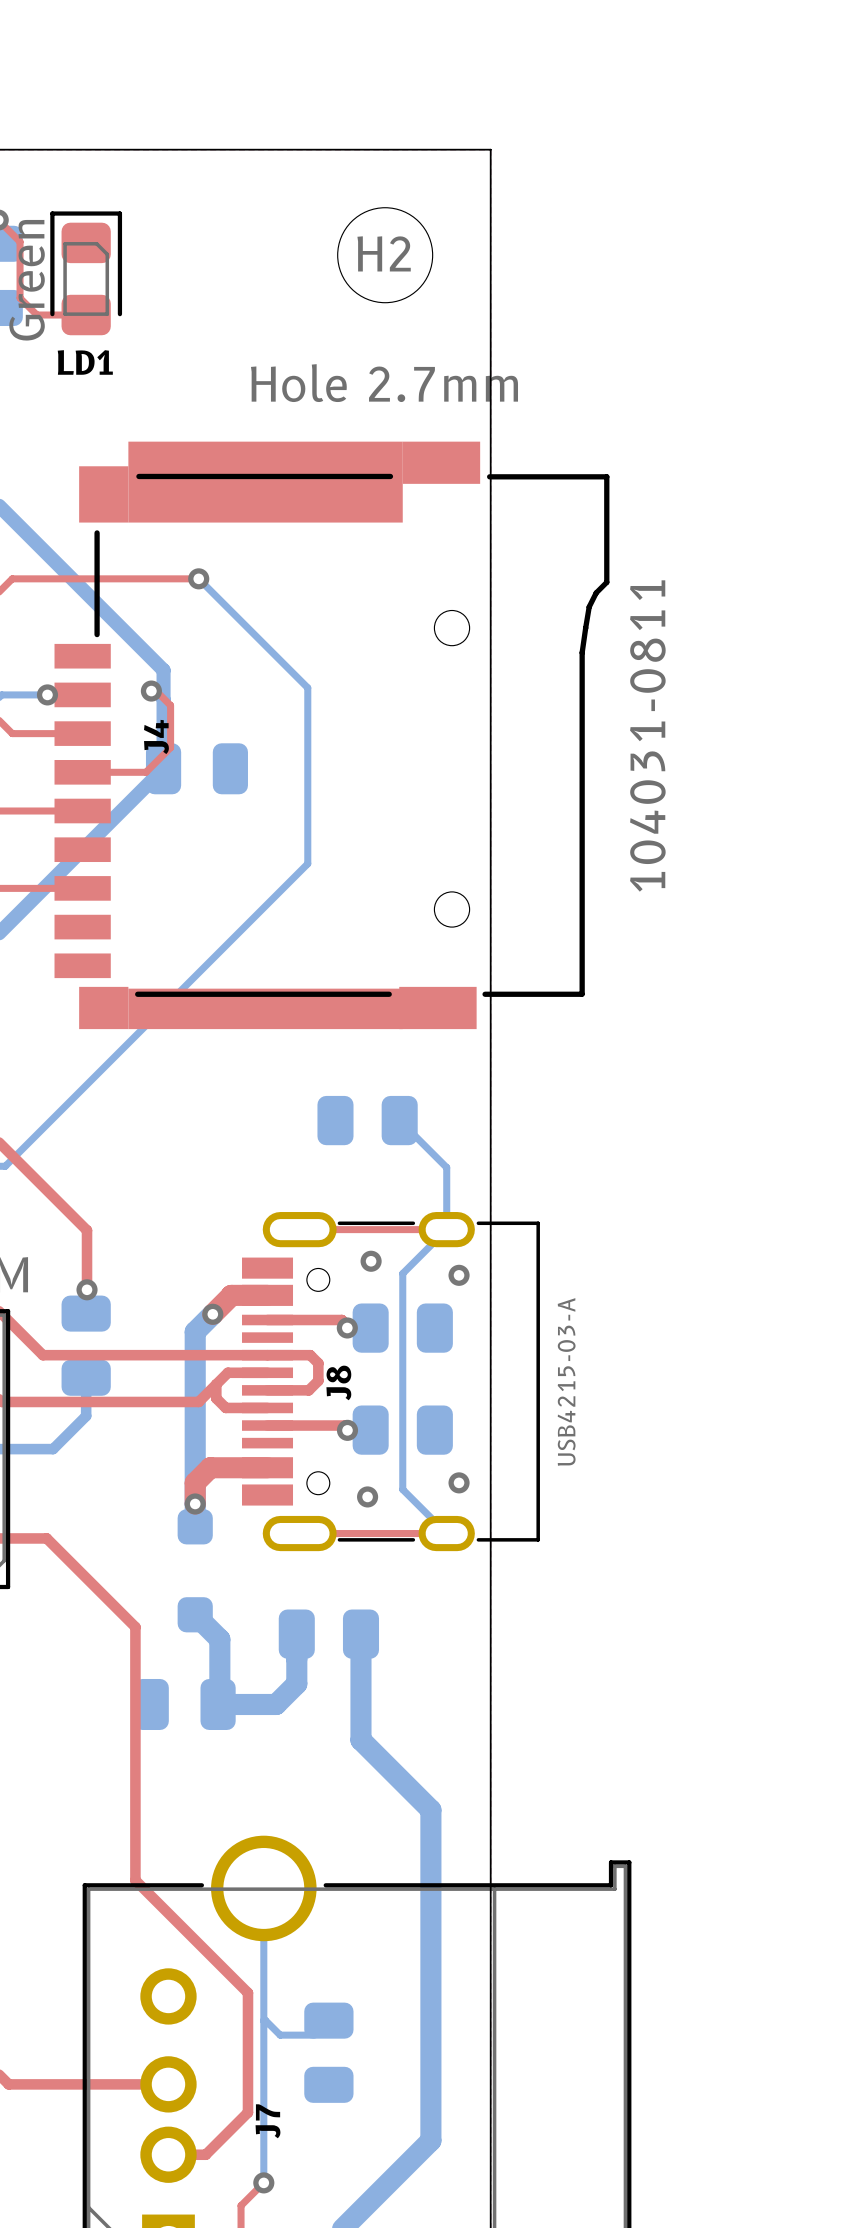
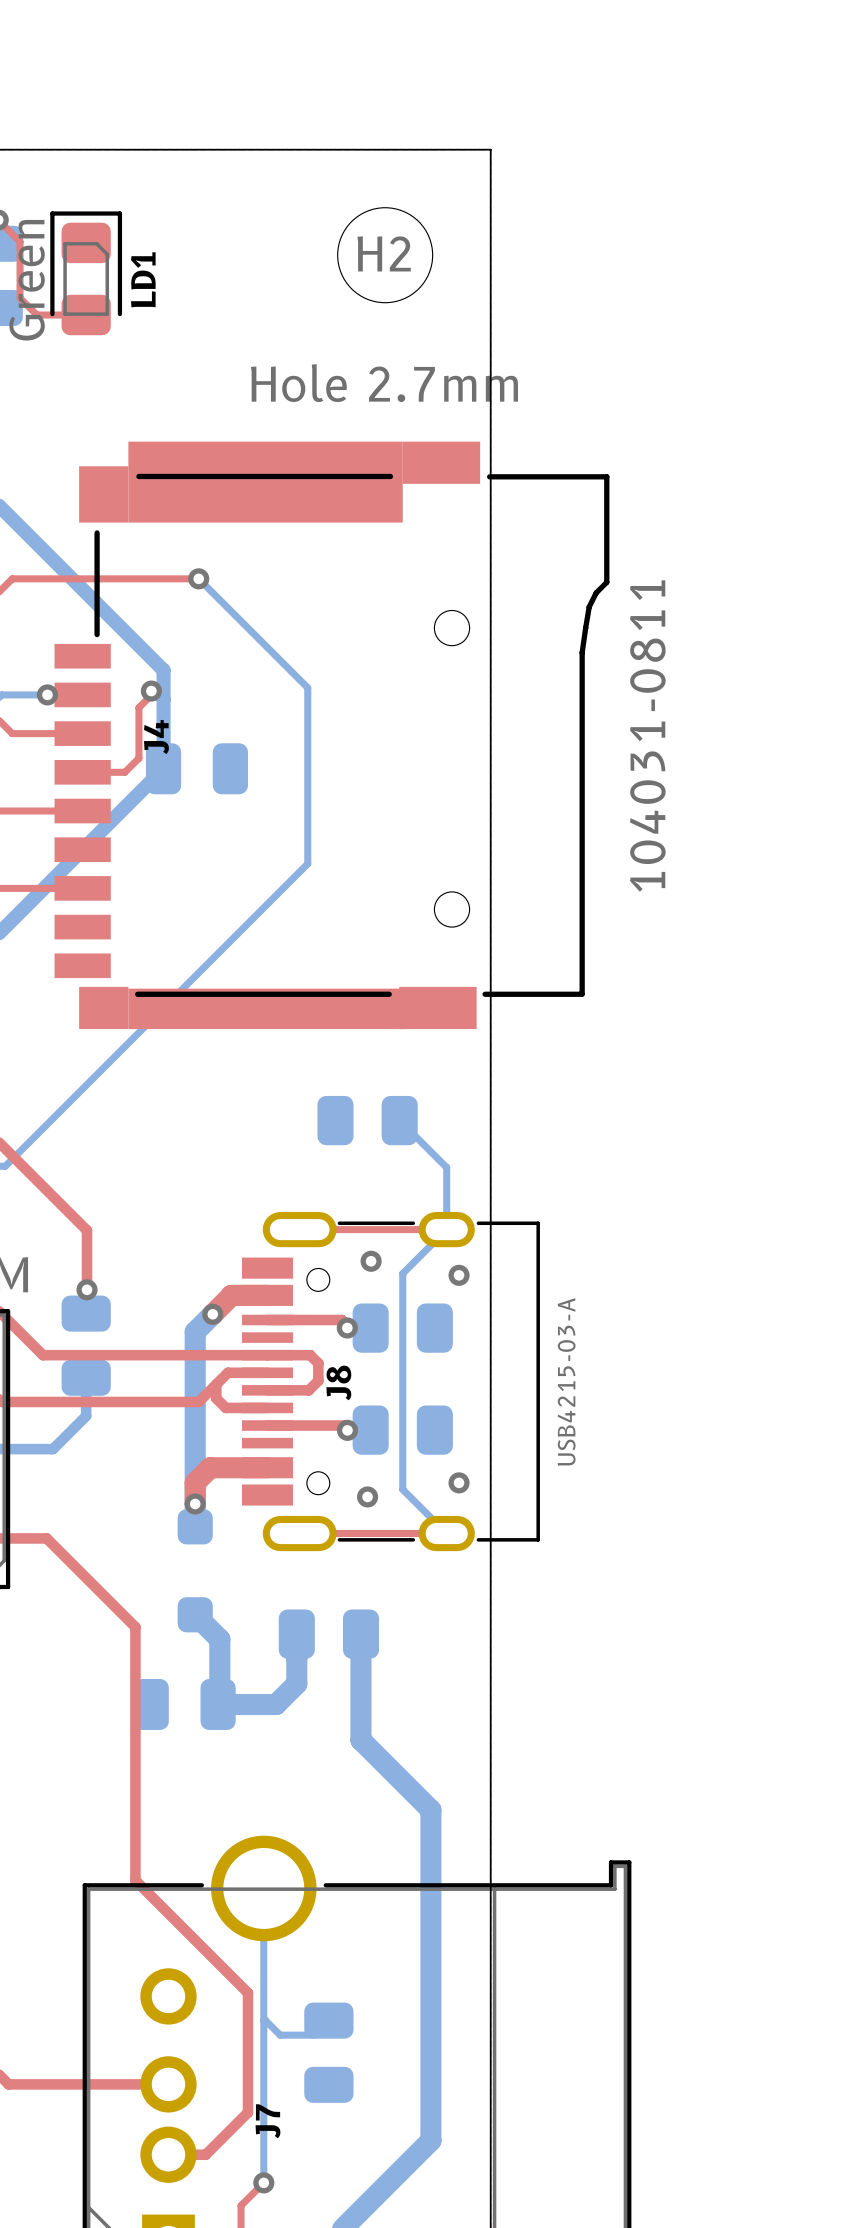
LD1 name rotation: 0° (85, 362) -> 90° counterclockwise (143, 279)
LD1 name position: LD1 (85, 362) -> LD1 (143, 279)
top track: (151, 691) (156, 691) (170, 705) (170, 747) (145, 772) (124, 772) -> (151, 691) (151, 695) (138, 707) (138, 758) (124, 772)

